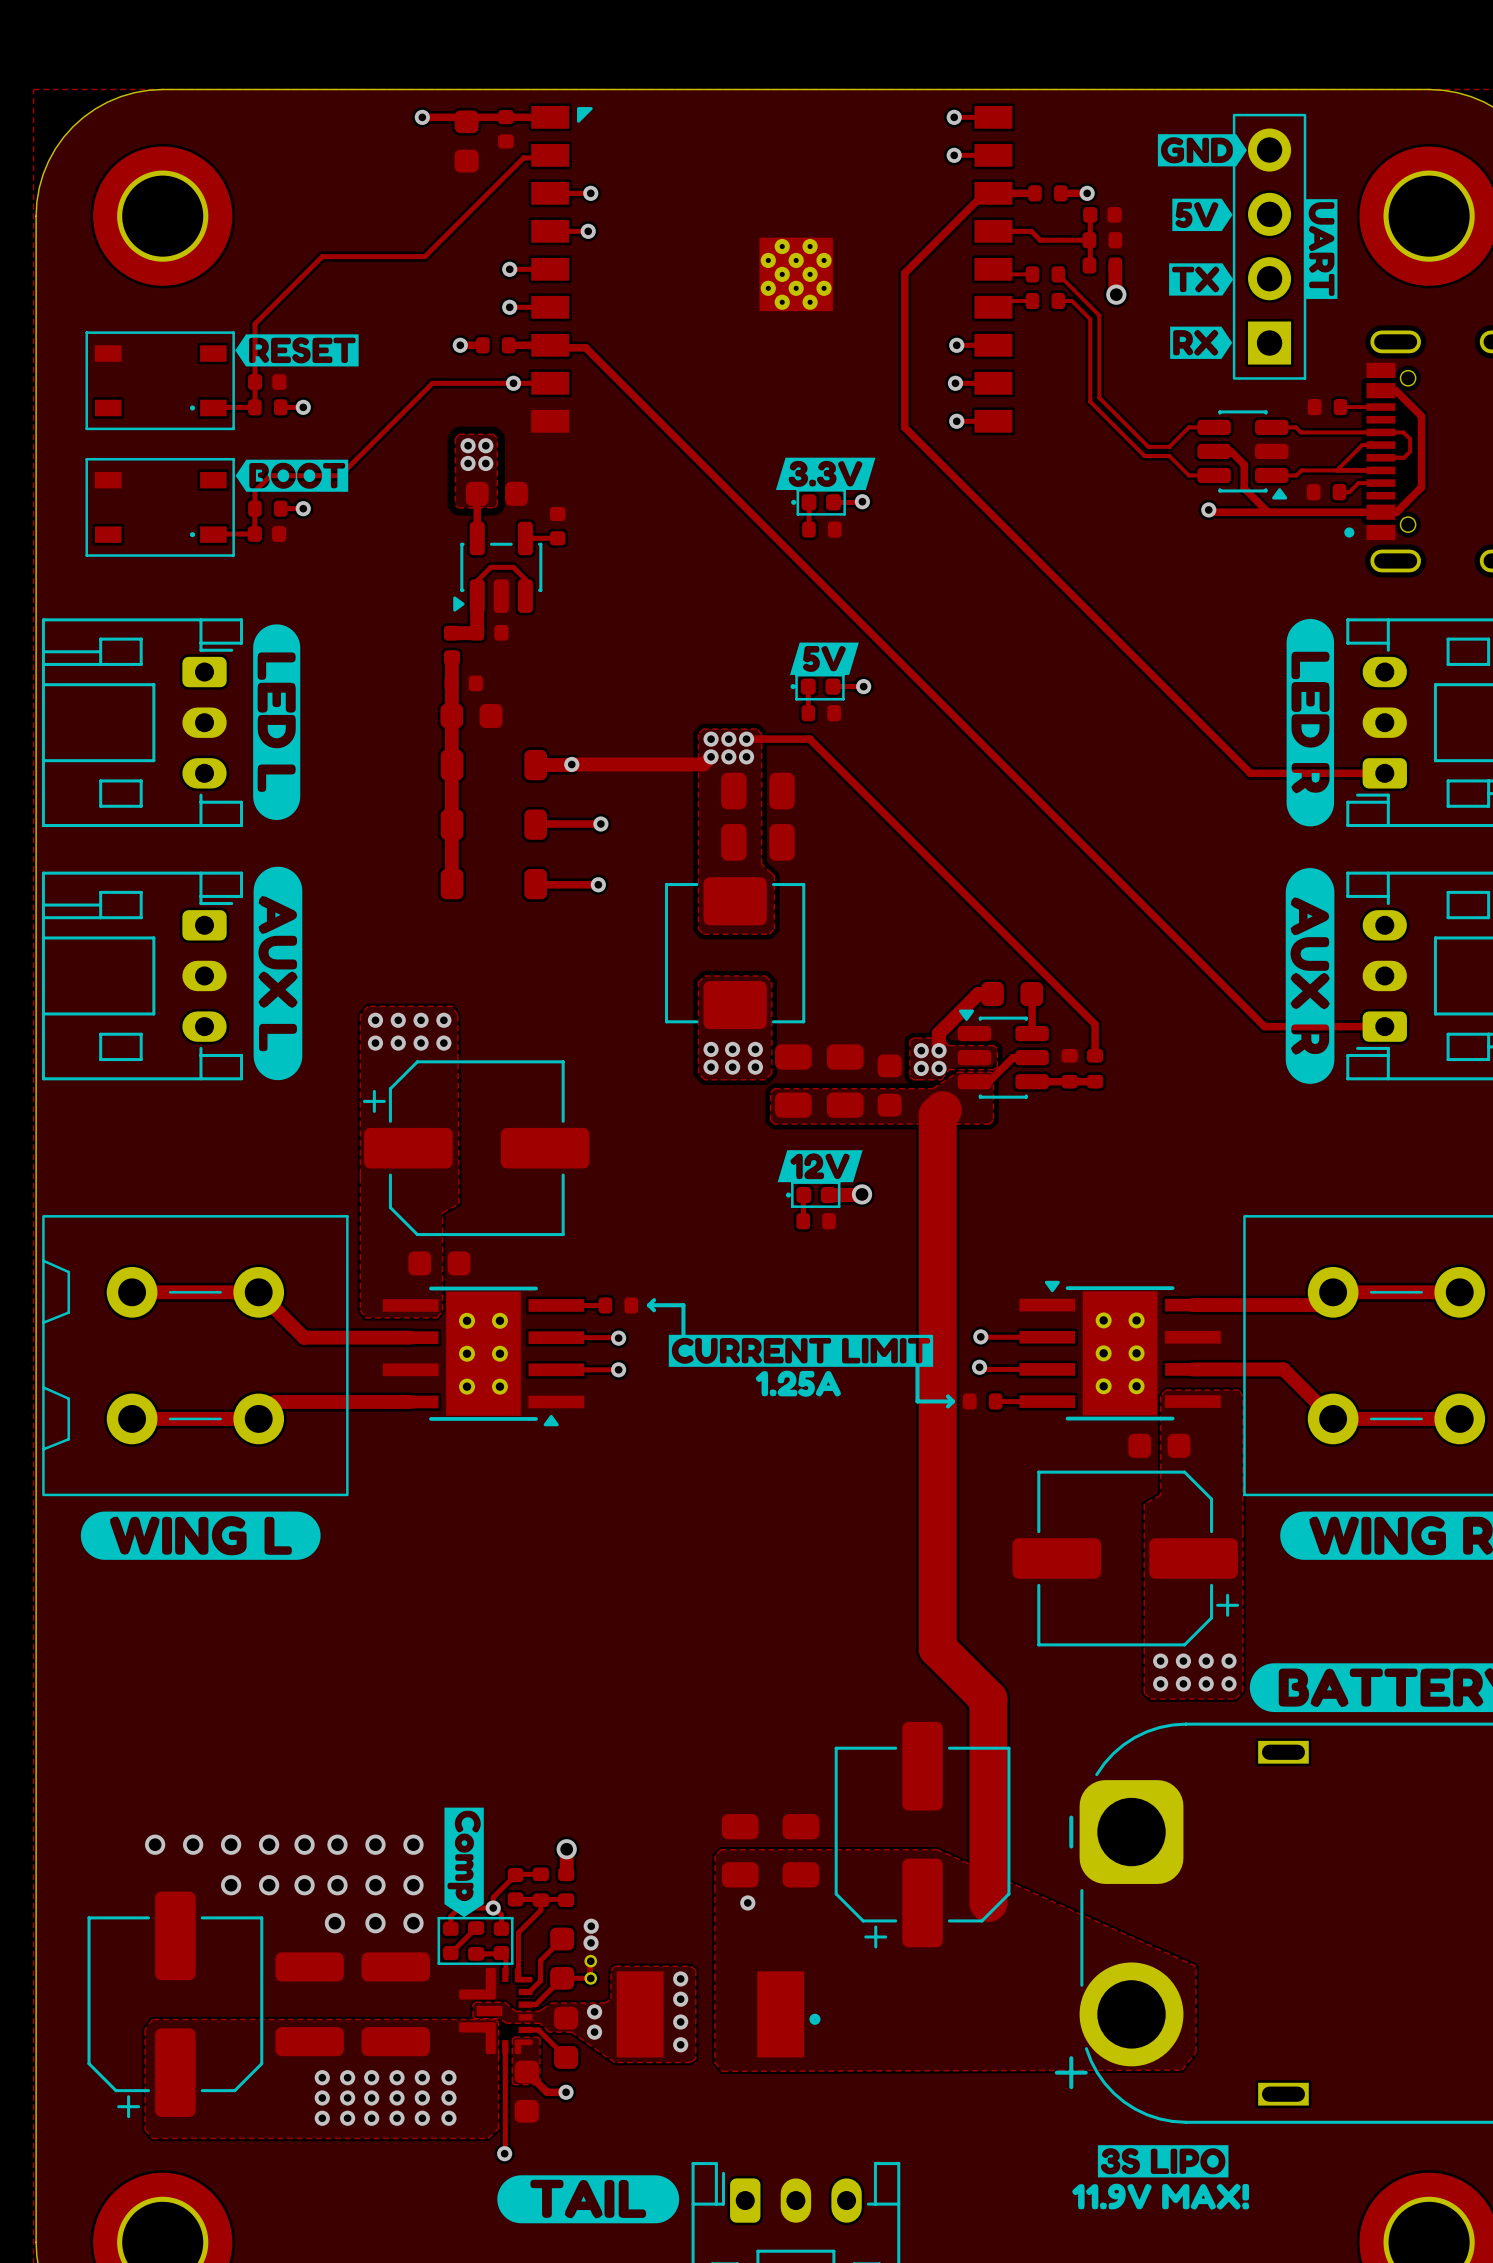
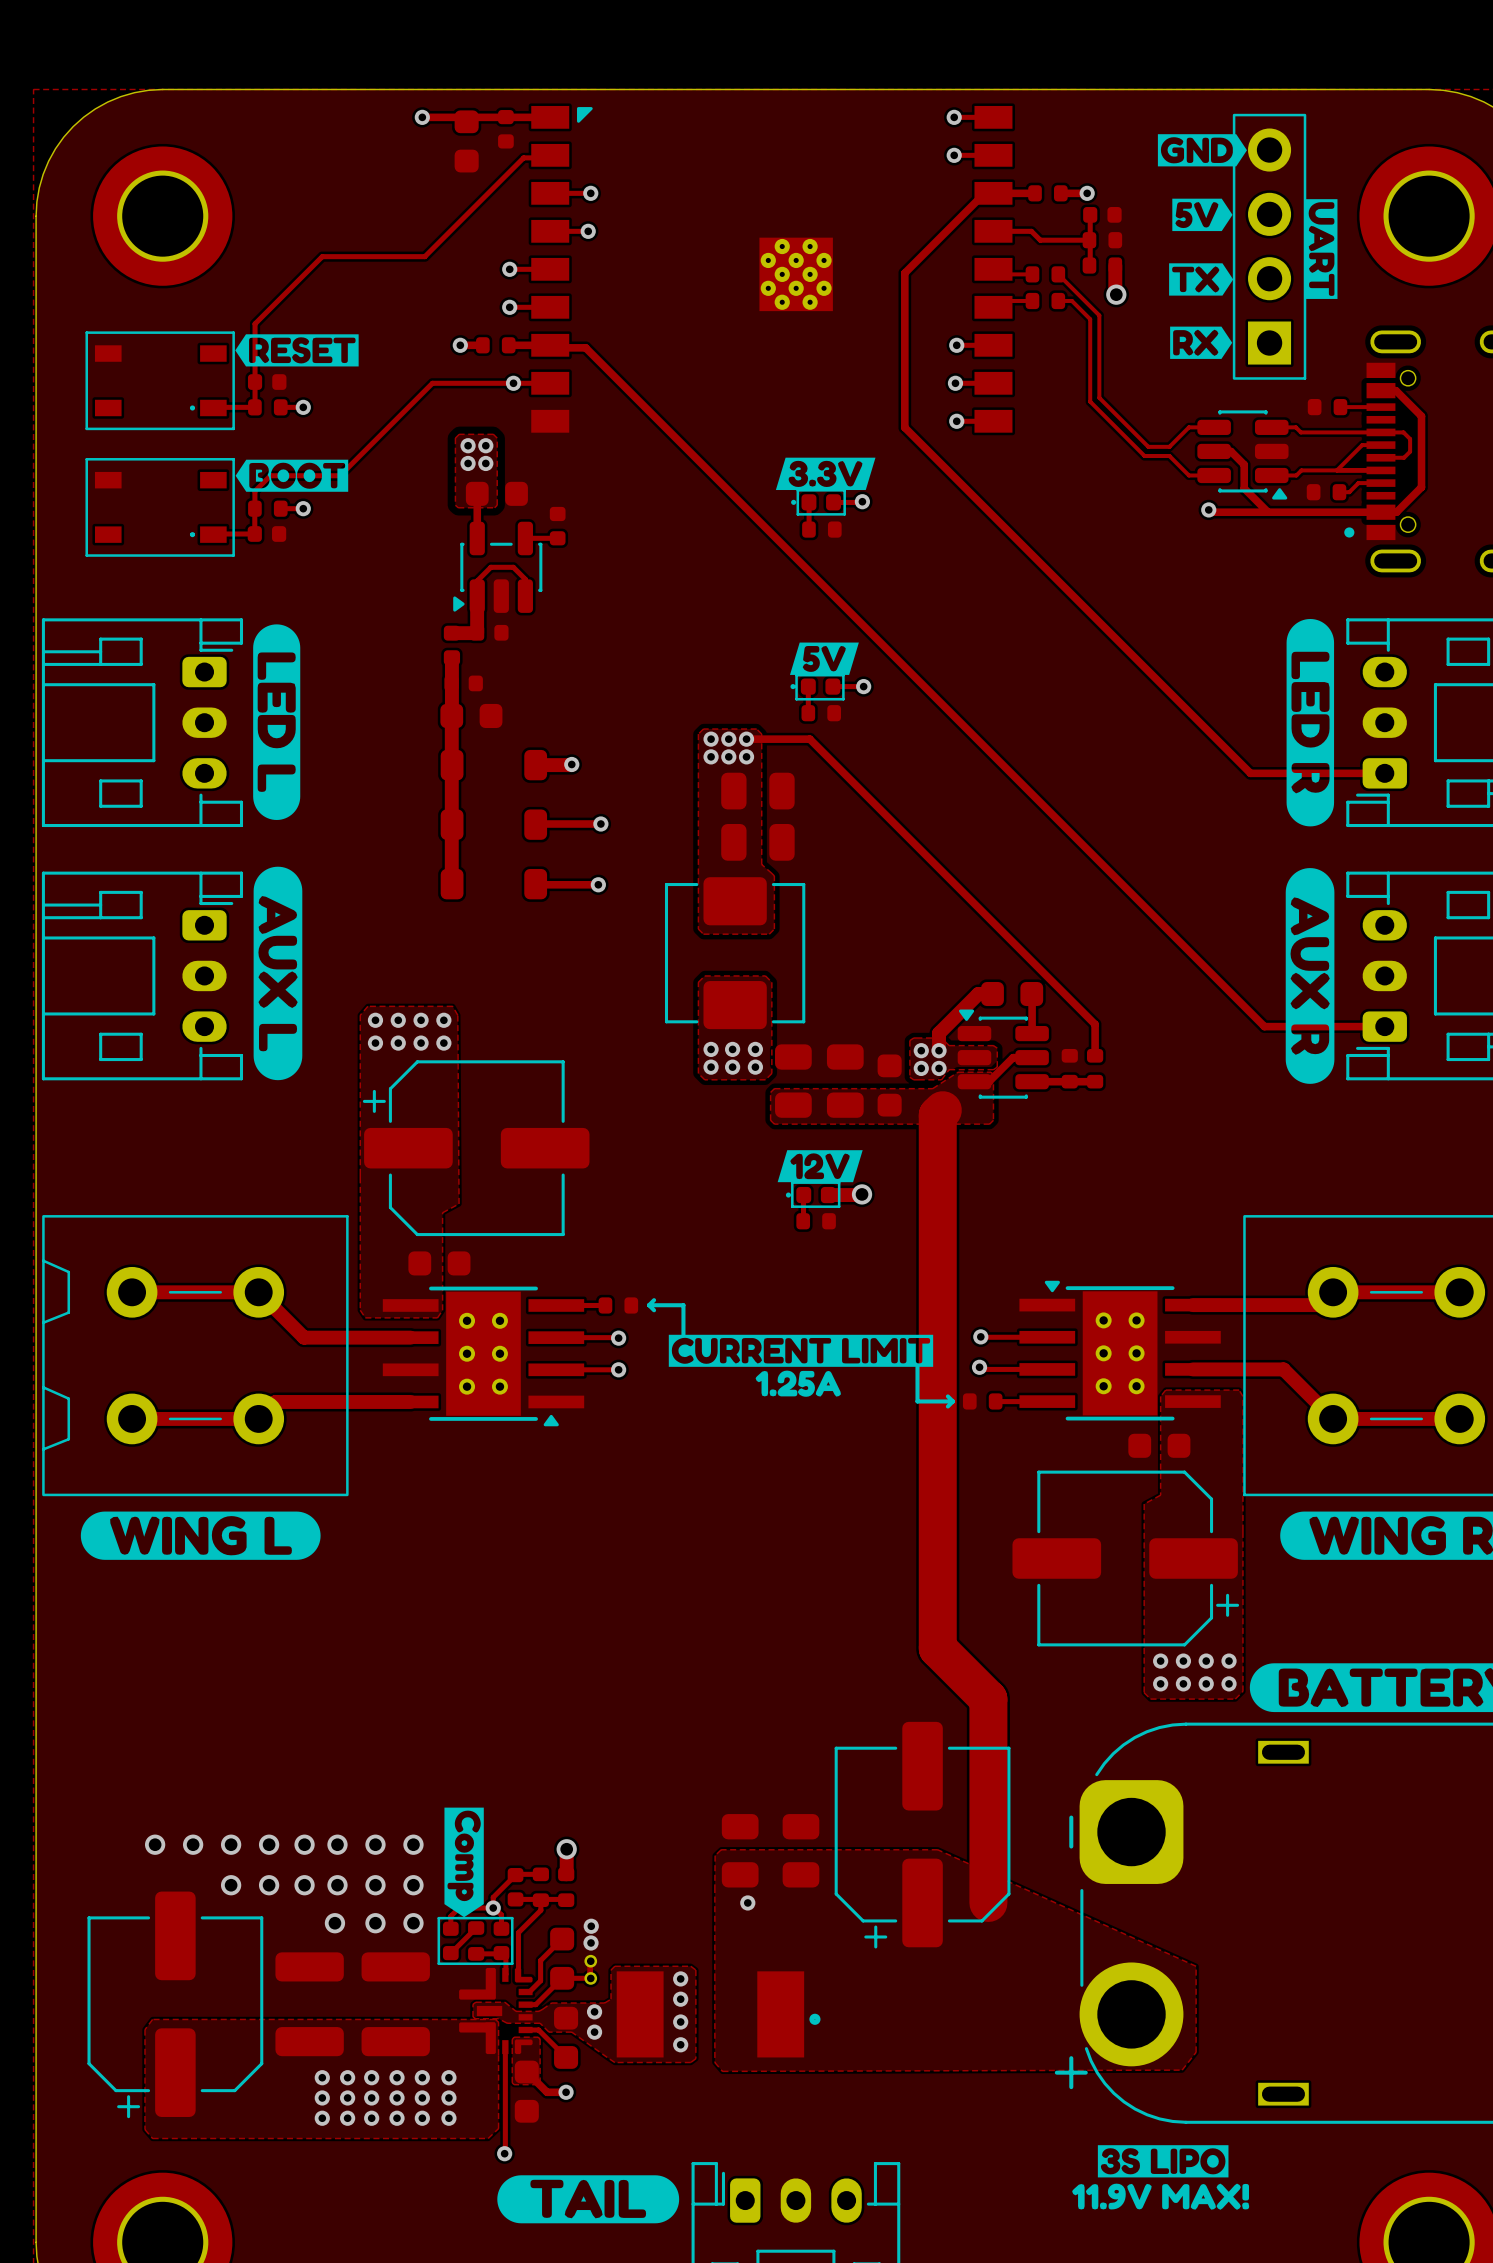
track: (711, 756) (703, 764) (571, 764) -> none

